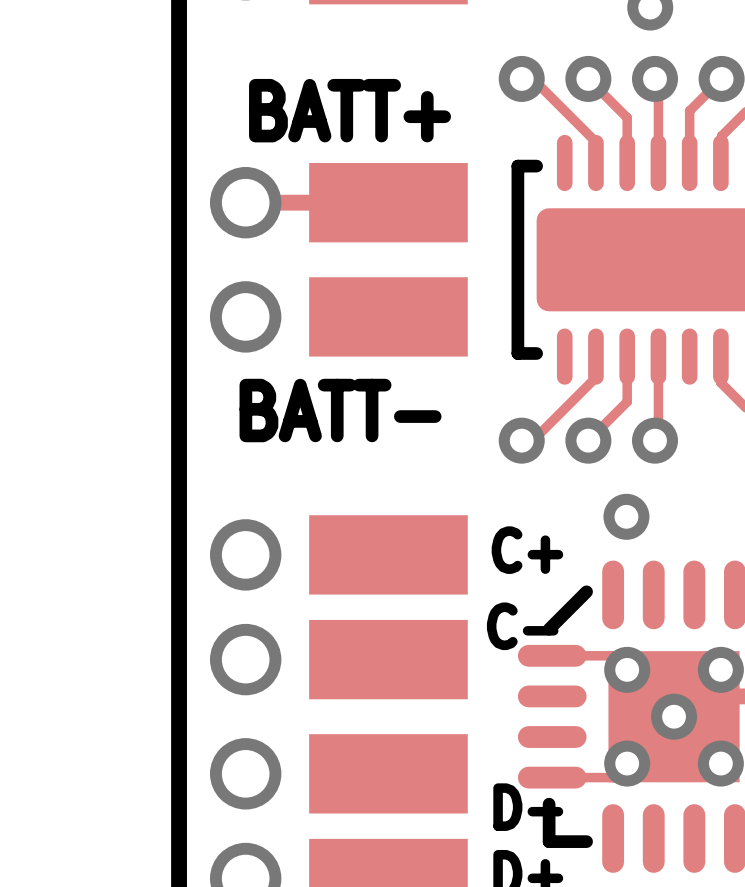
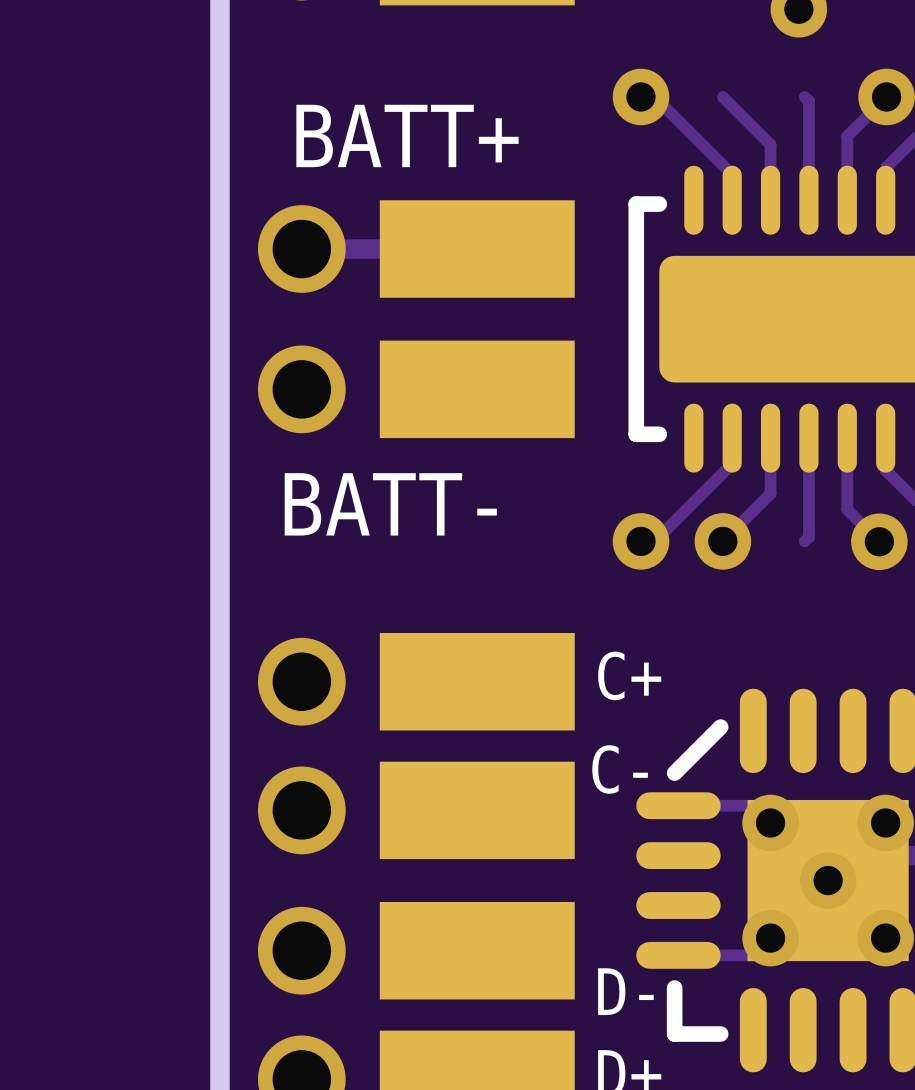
via: (588, 78) -> none
via: (655, 78) -> none
track: none -> (847, 438) (847, 509) (879, 541)
via: (655, 440) -> none
via: none -> (879, 541)
via: (626, 516) -> none

